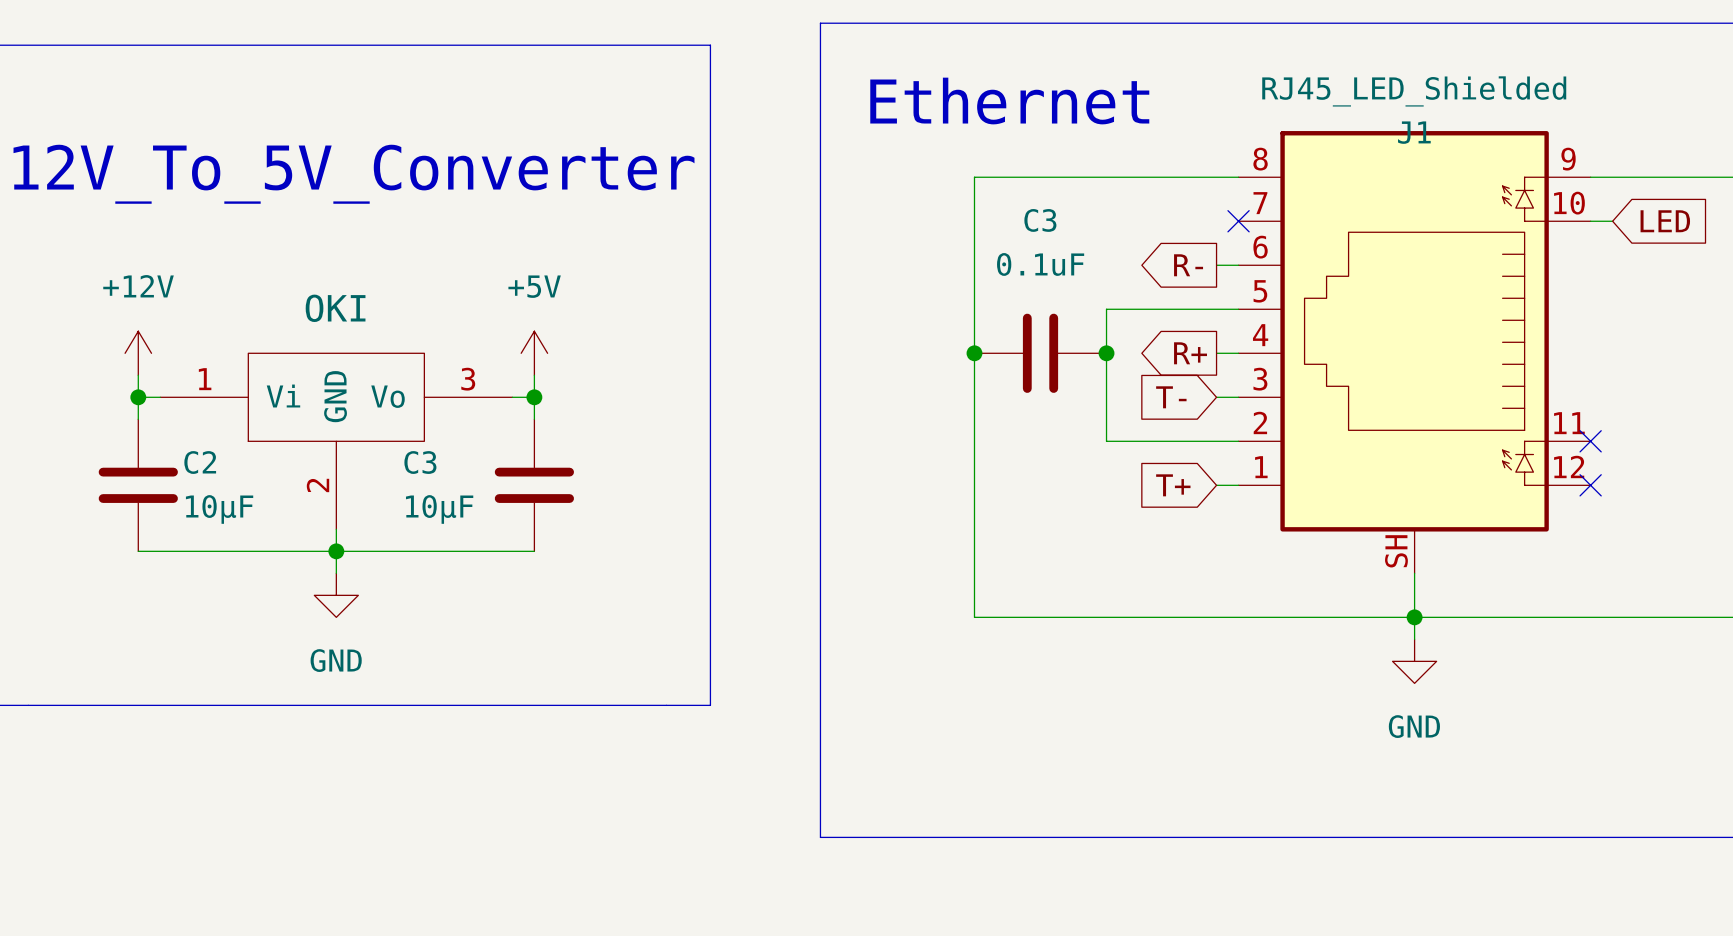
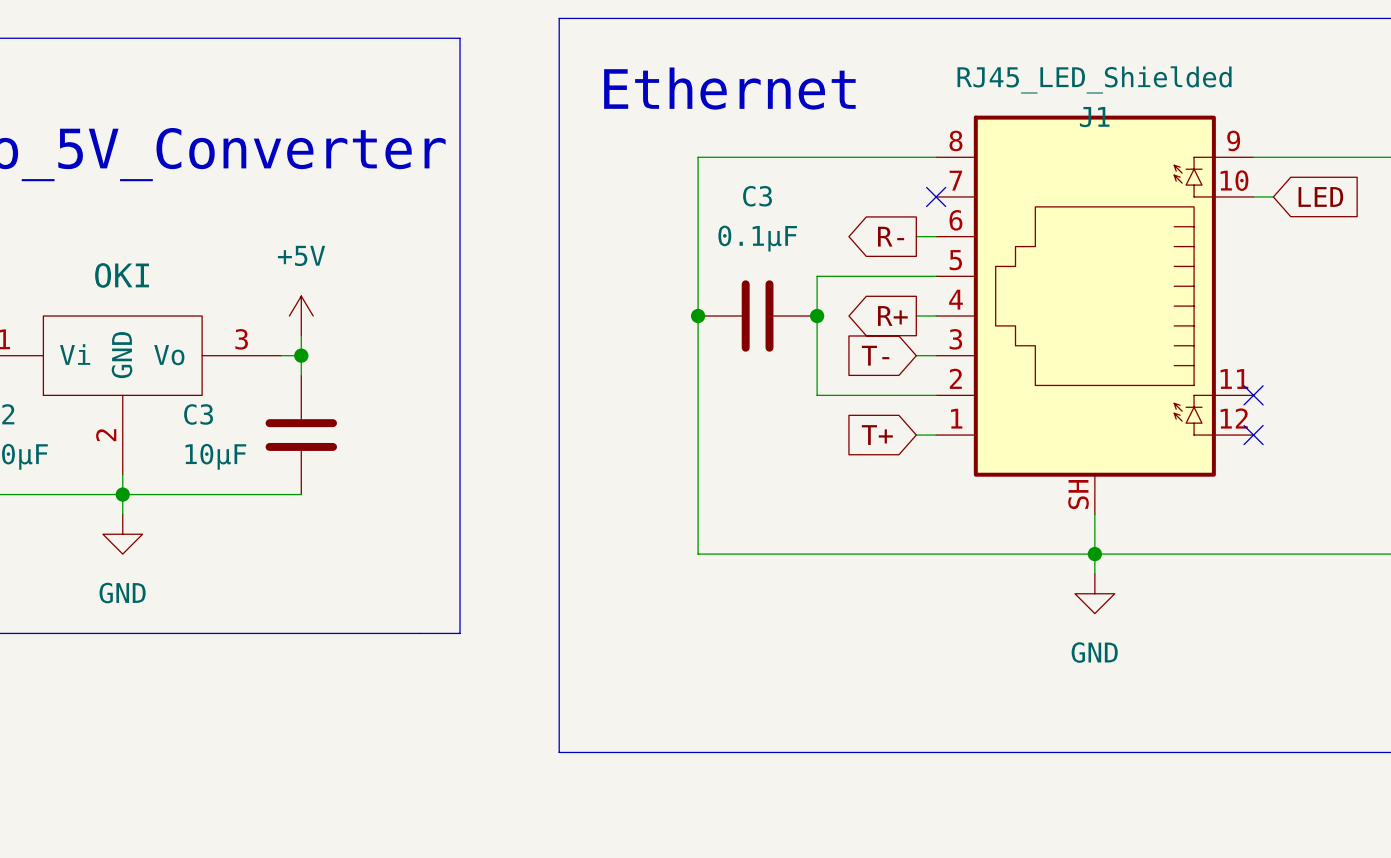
C3 value: 0.1uF (1040, 264) -> 0.1µF (757, 238)

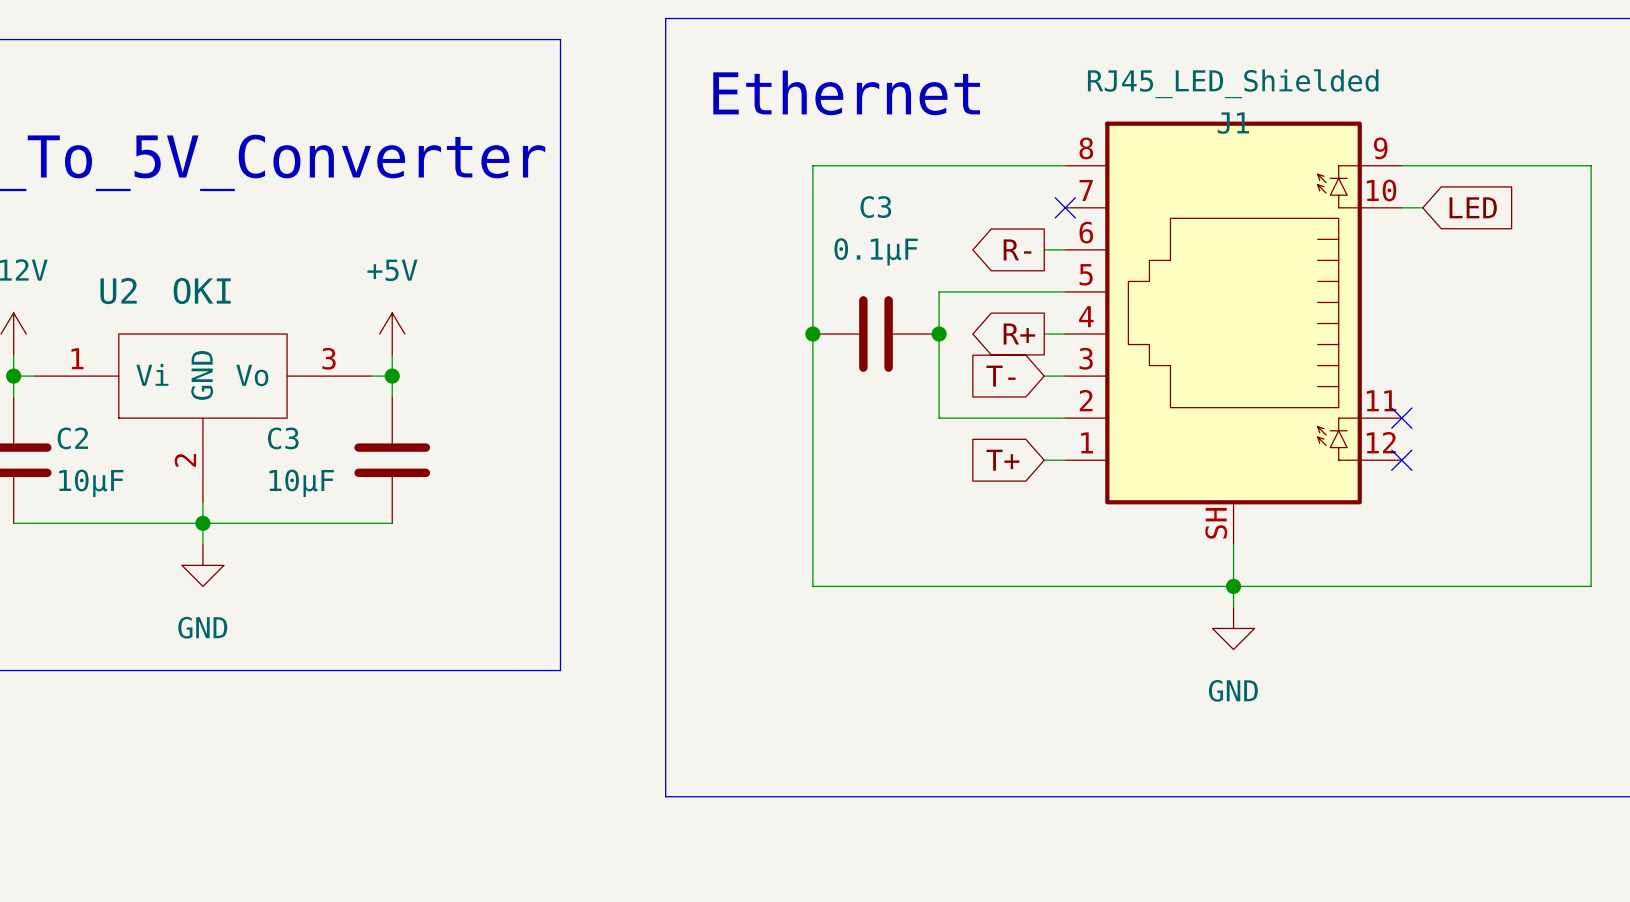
U2 name: none -> U2 (118, 291)

